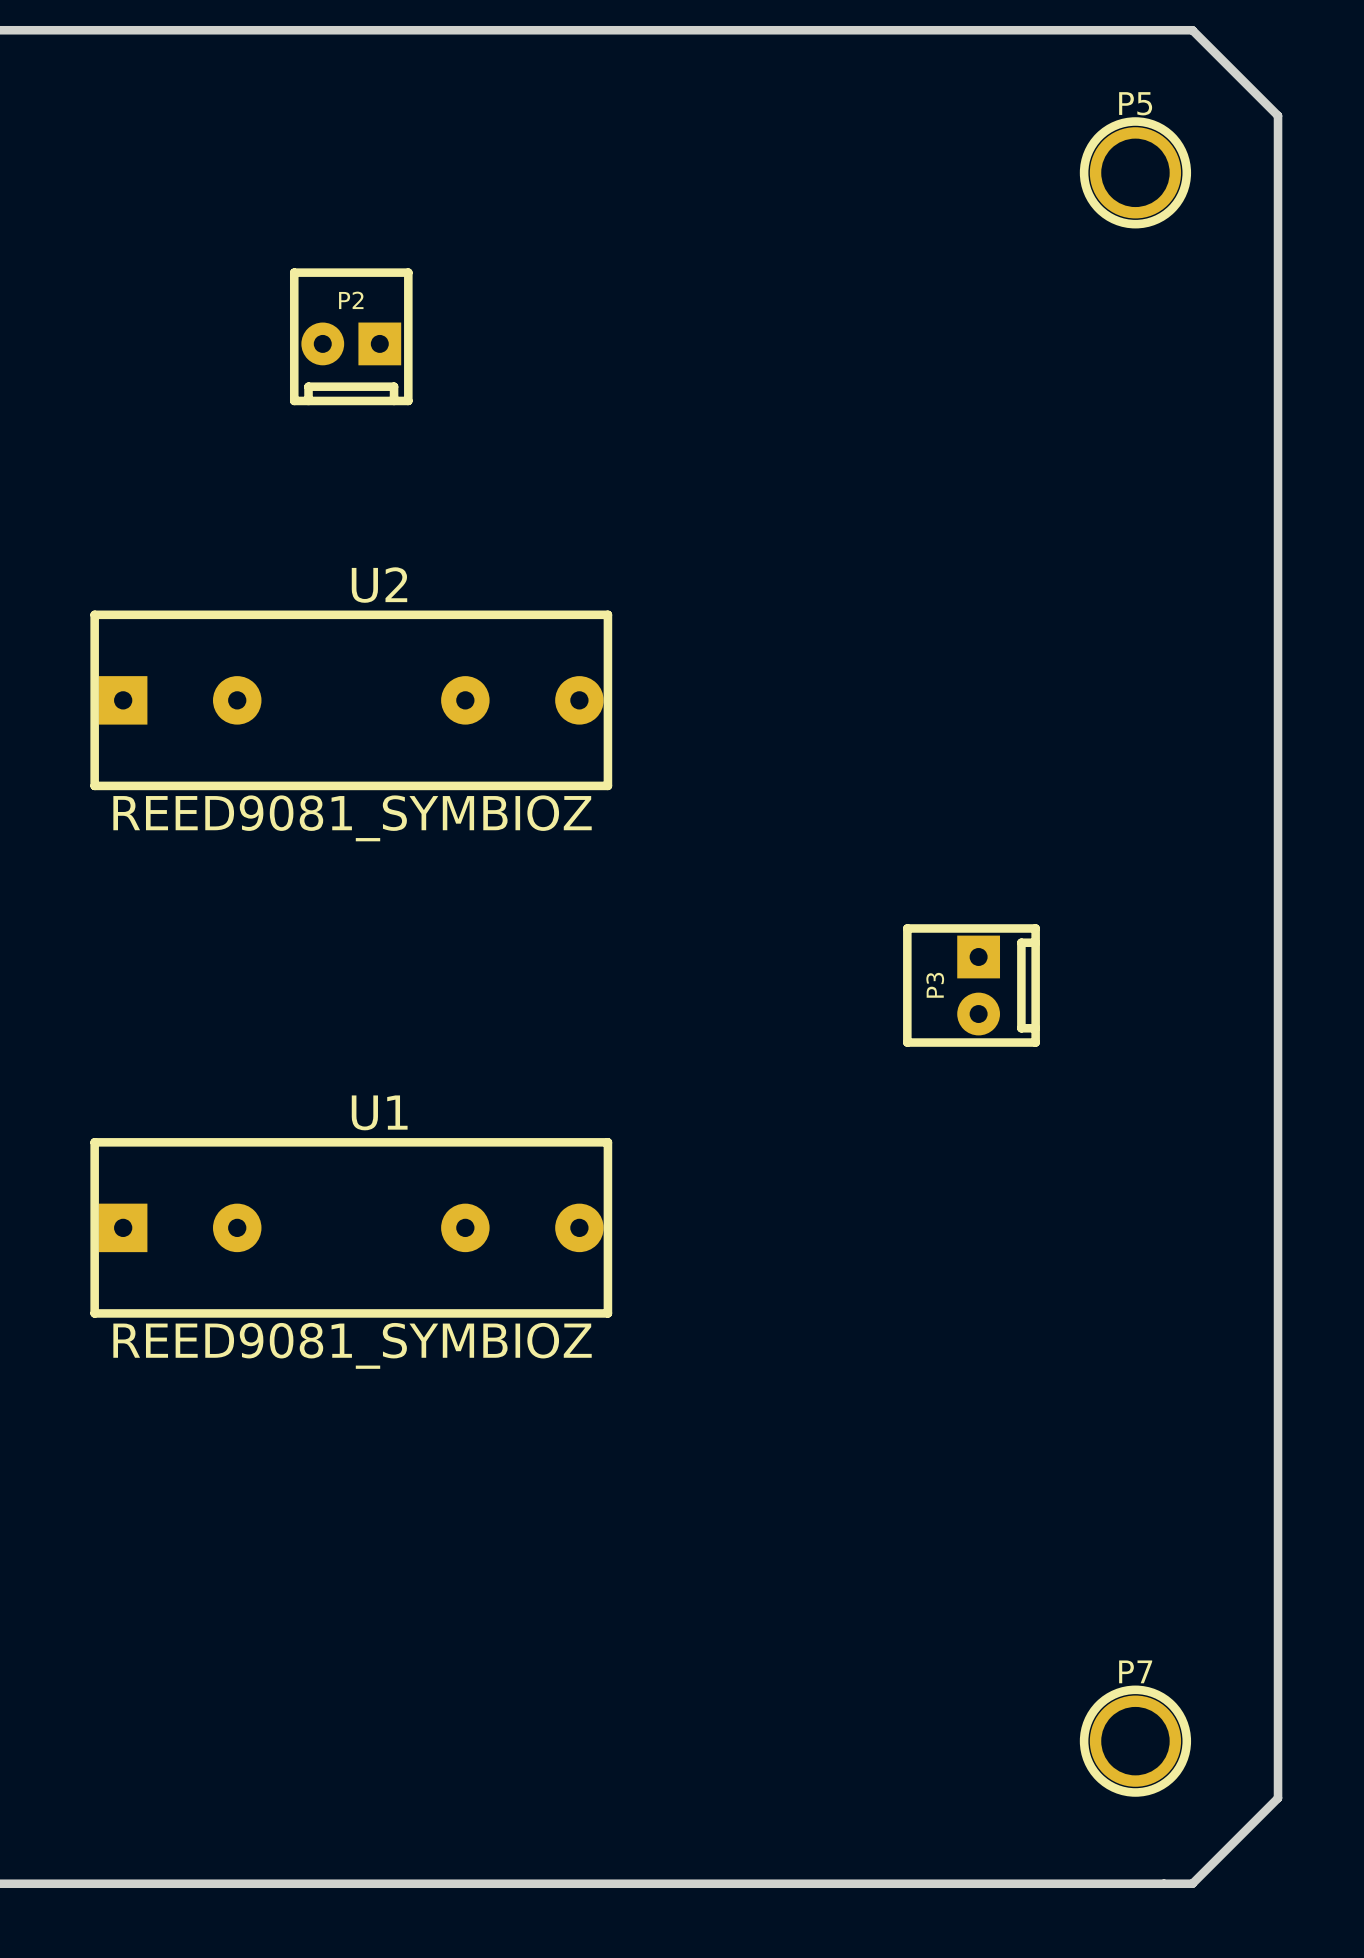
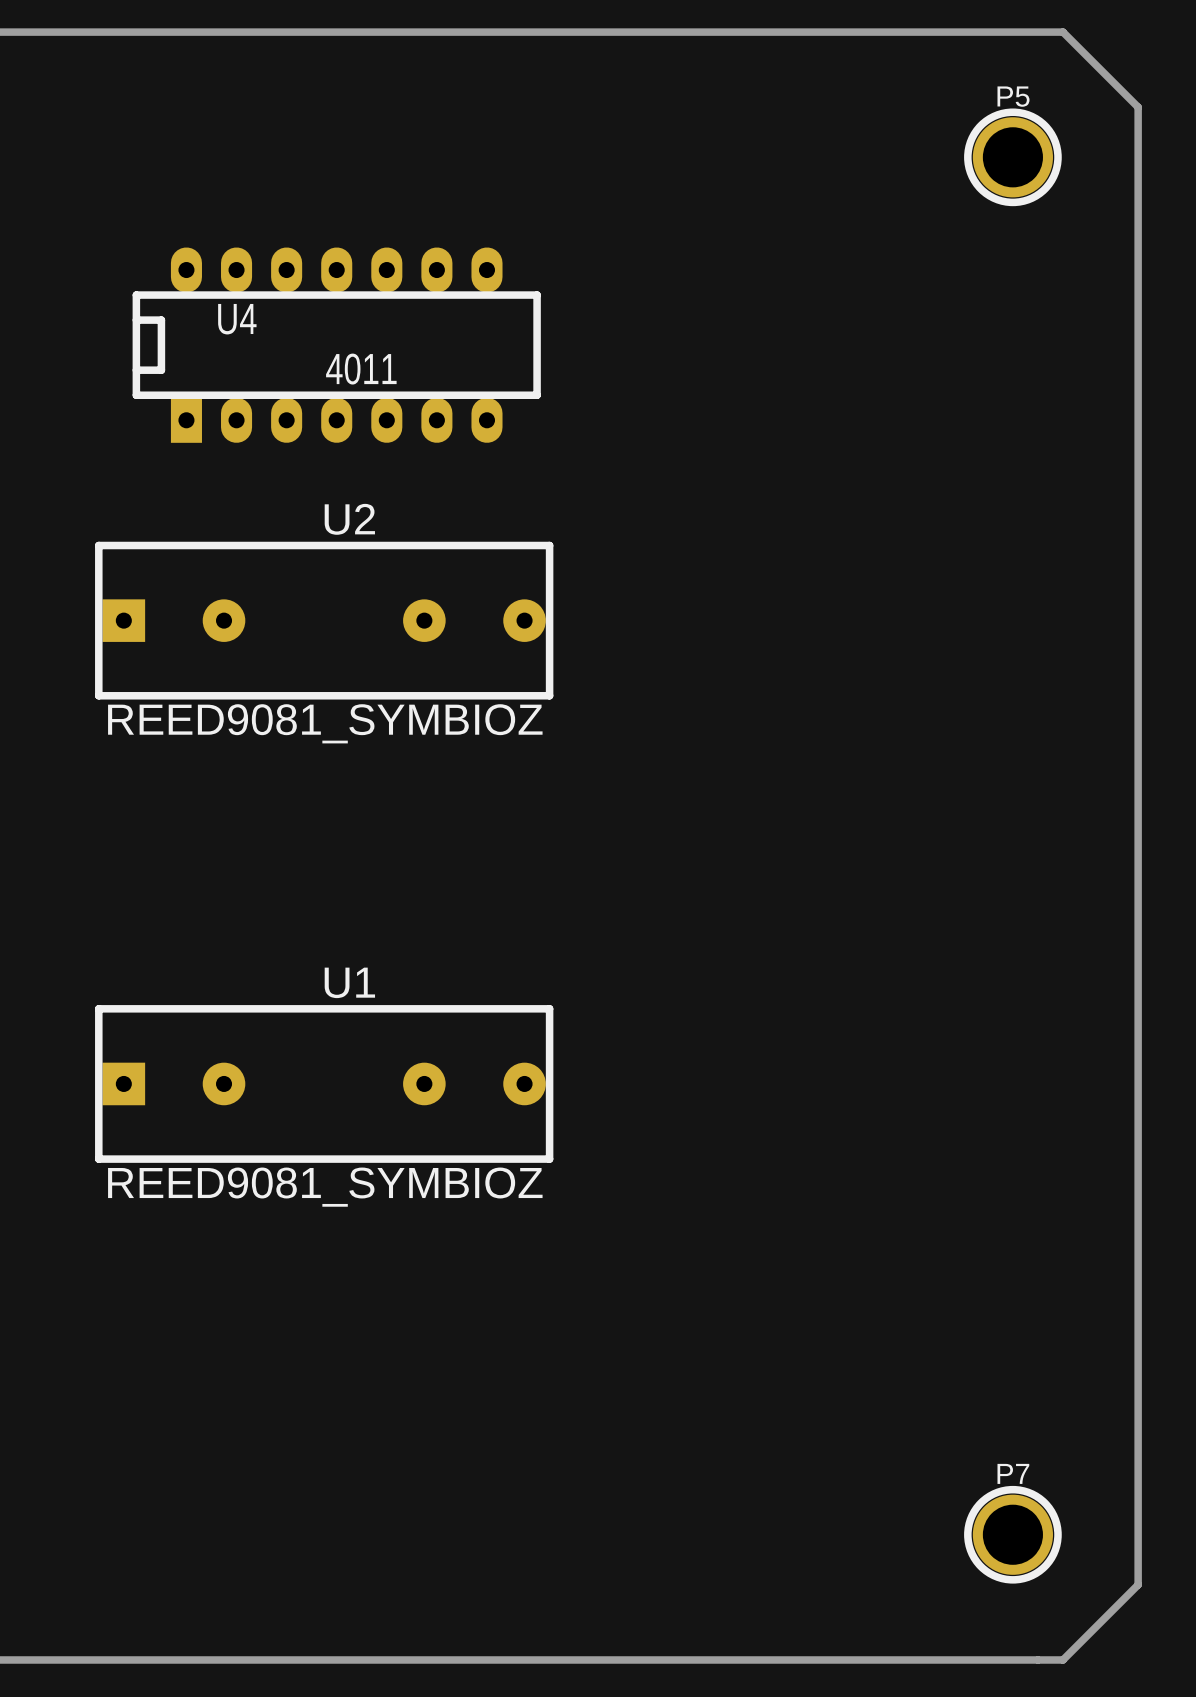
P2: (351, 336) -> none
U4: none -> 4011 (336, 345)
P3: (971, 985) -> none

